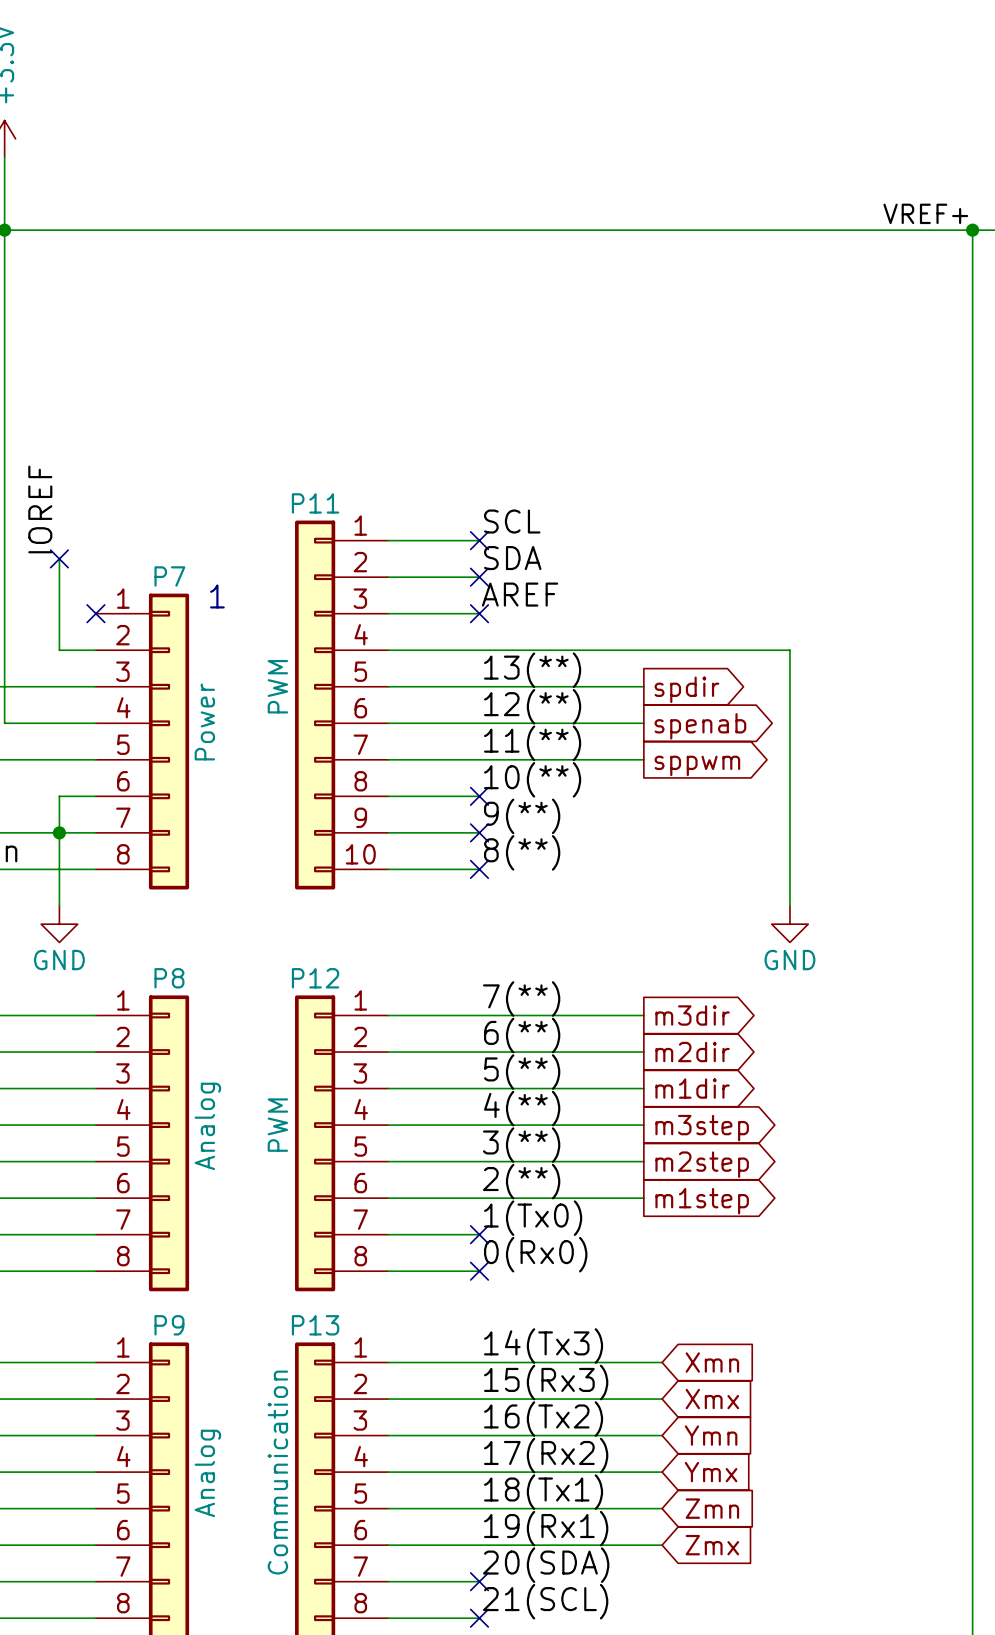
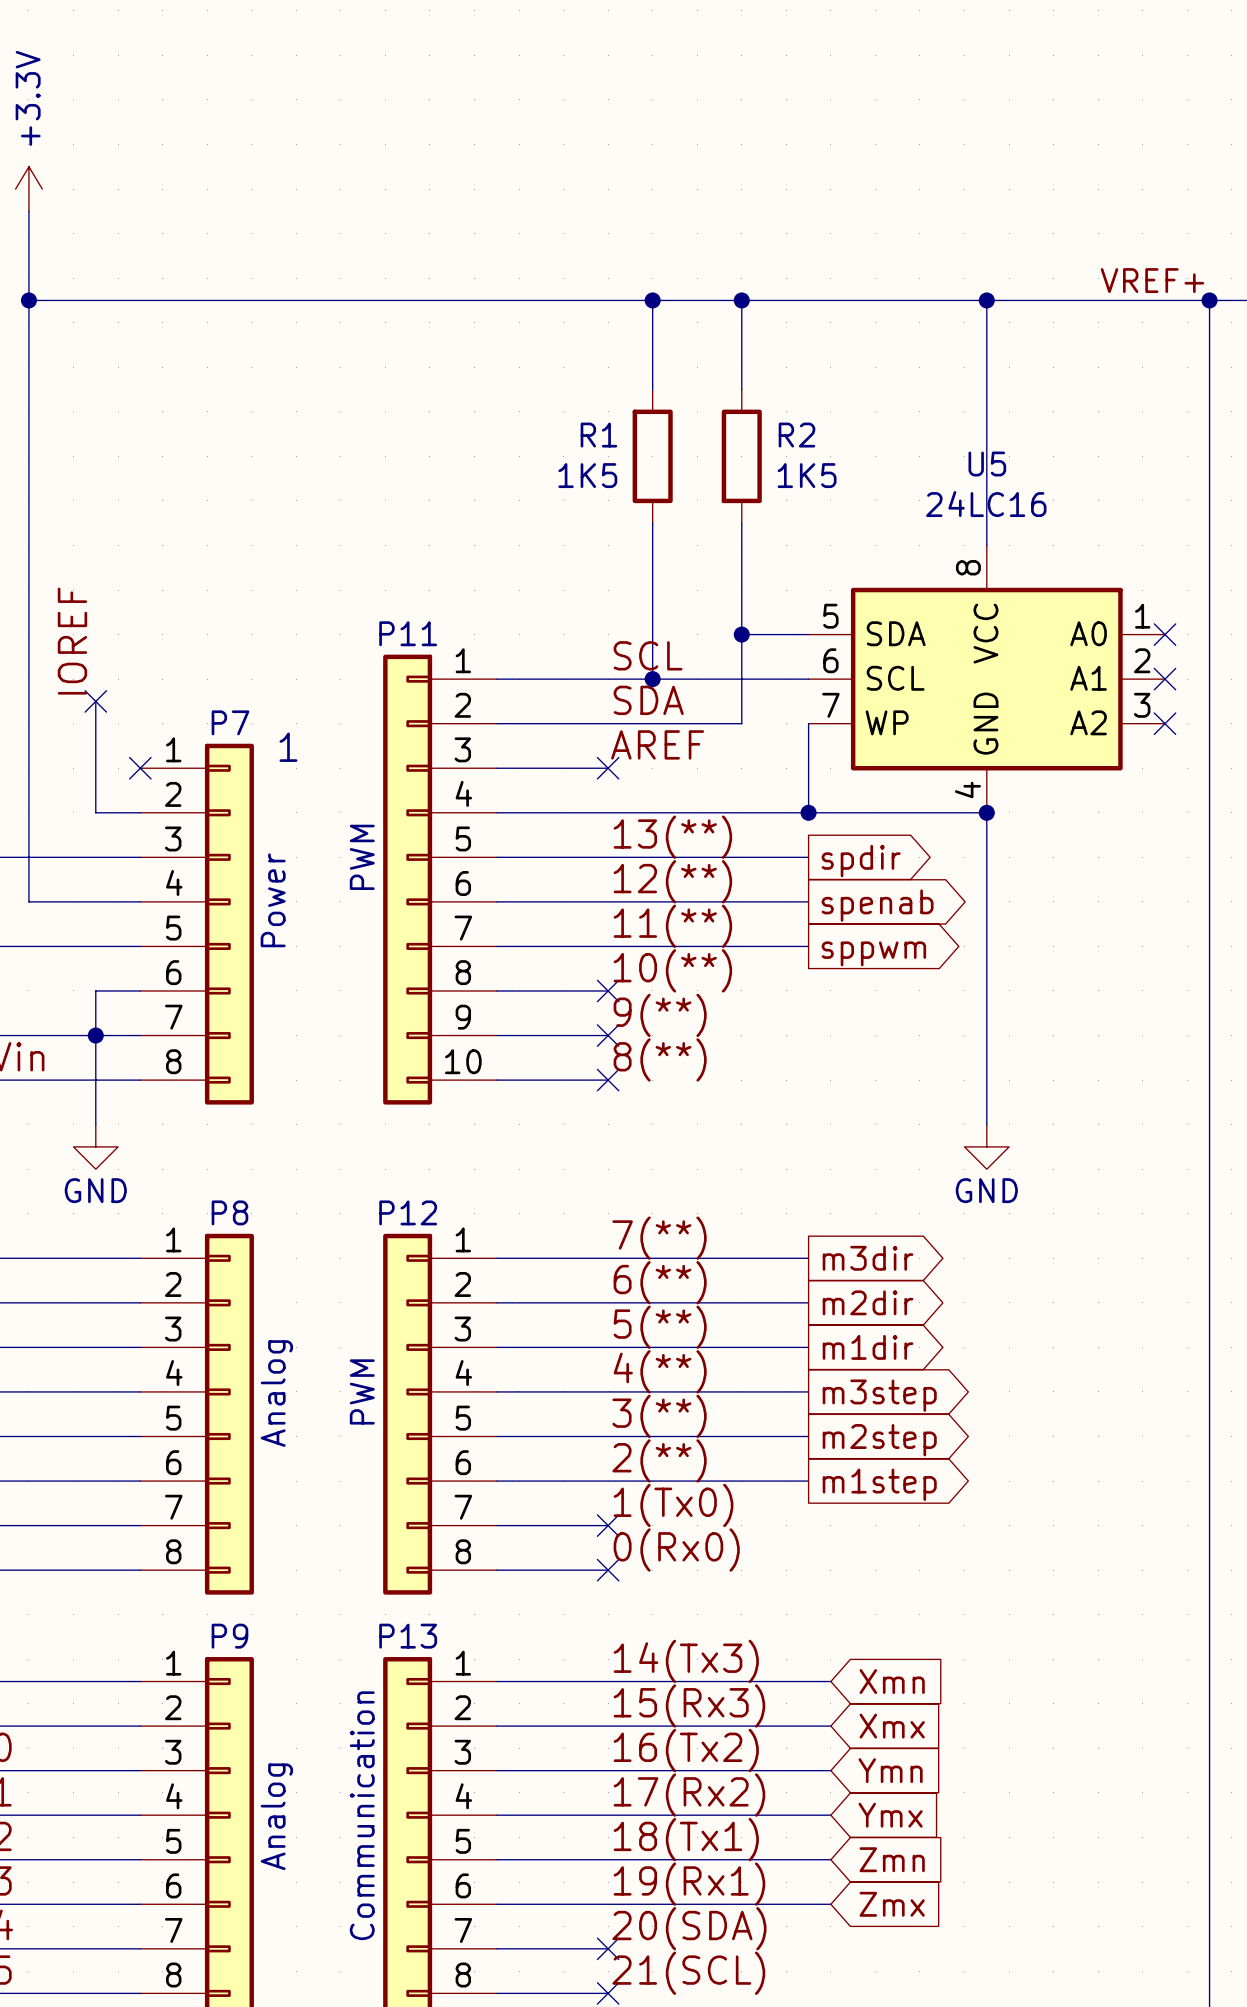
wire: none -> (652, 300) (652, 389)
junction: none -> (652, 300)
wire: none -> (741, 300) (741, 389)
junction: none -> (741, 300)
wire: none -> (986, 300) (986, 545)
junction: none -> (986, 300)
R1: none -> 1K5 (652, 456)
R2: none -> 1K5 (741, 456)
wire: none -> (652, 523) (652, 679)
wire: none -> (741, 523) (741, 723) (608, 723)
wire: none -> (741, 634) (808, 634)
junction: none -> (741, 634)
no-connect mark: none -> (1165, 634)
wire: none -> (608, 679) (808, 679)
no-connect mark: (479, 540) -> none
junction: none -> (652, 679)
U5: none -> 24LC16 (986, 679)
no-connect mark: none -> (1165, 679)
no-connect mark: (479, 577) -> none
wire: none -> (808, 723) (808, 812)
no-connect mark: none -> (1165, 723)
junction: none -> (808, 812)
junction: none -> (986, 812)

